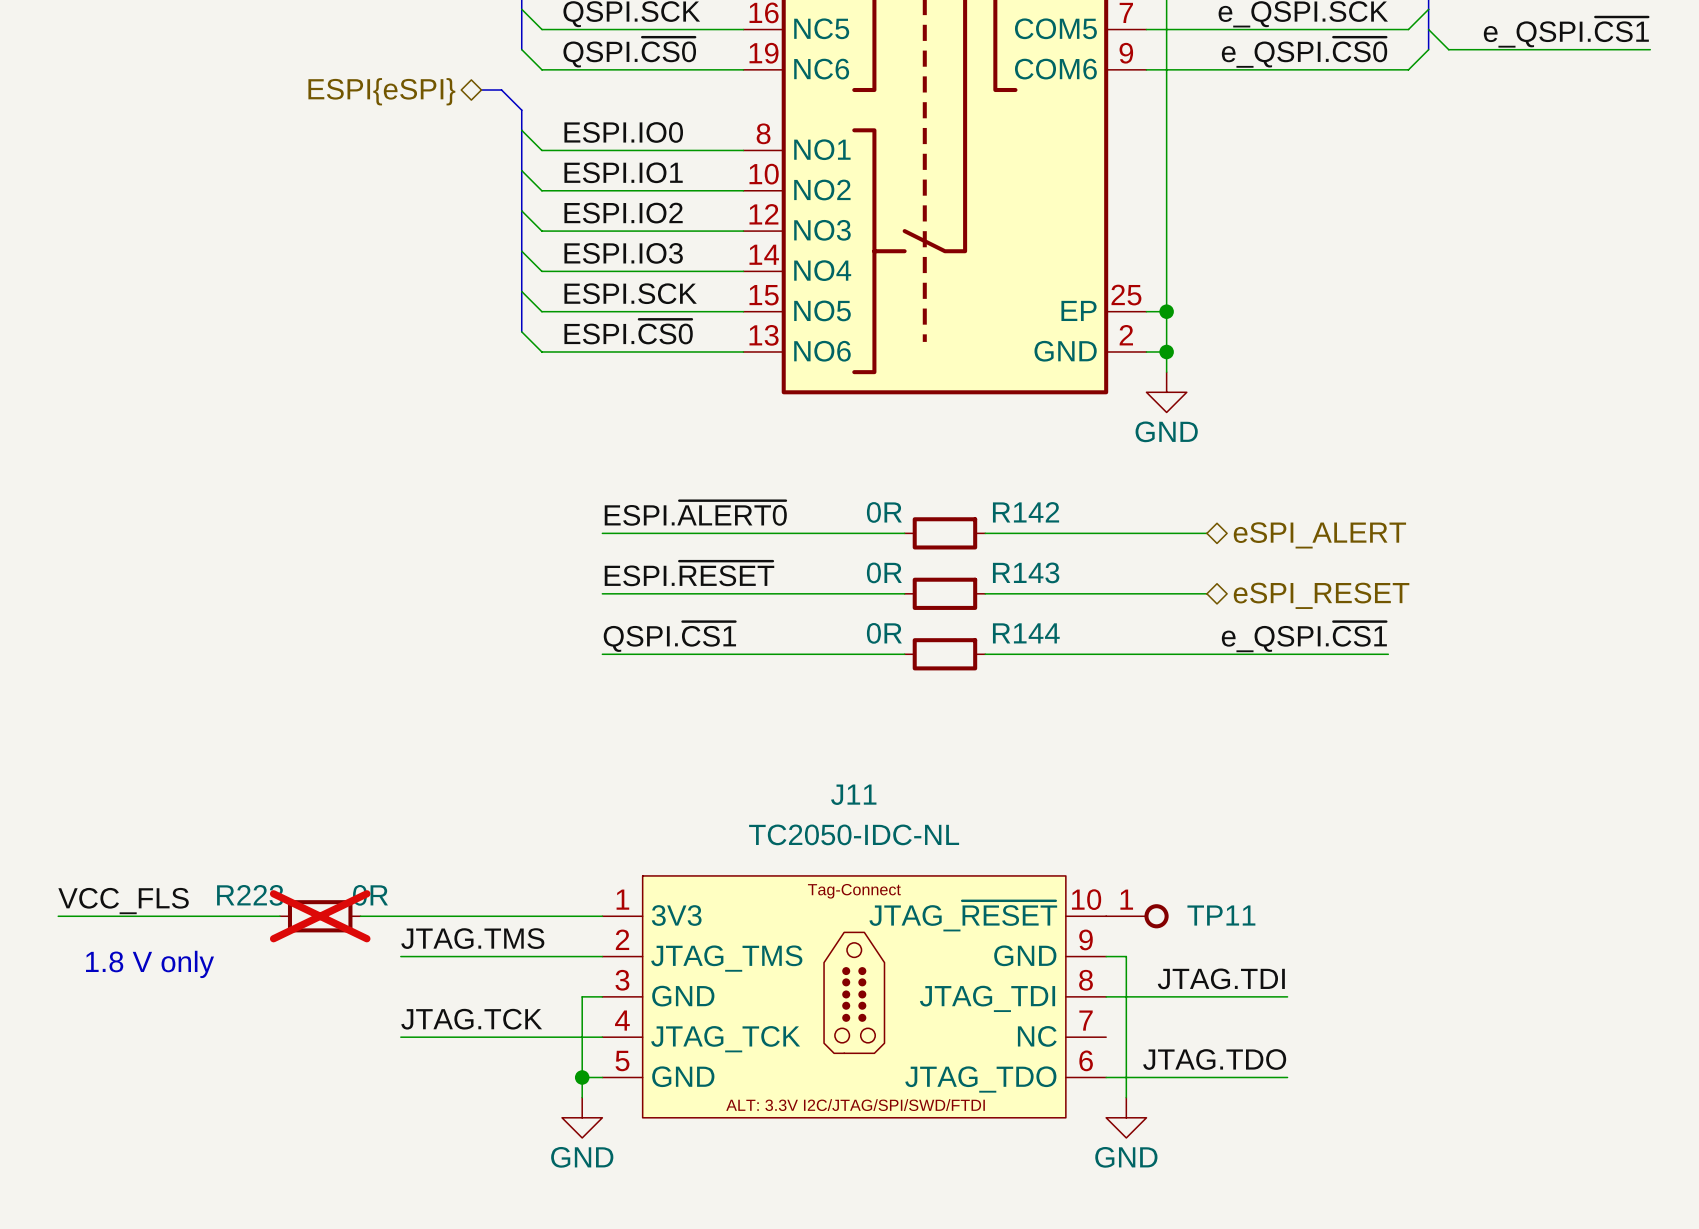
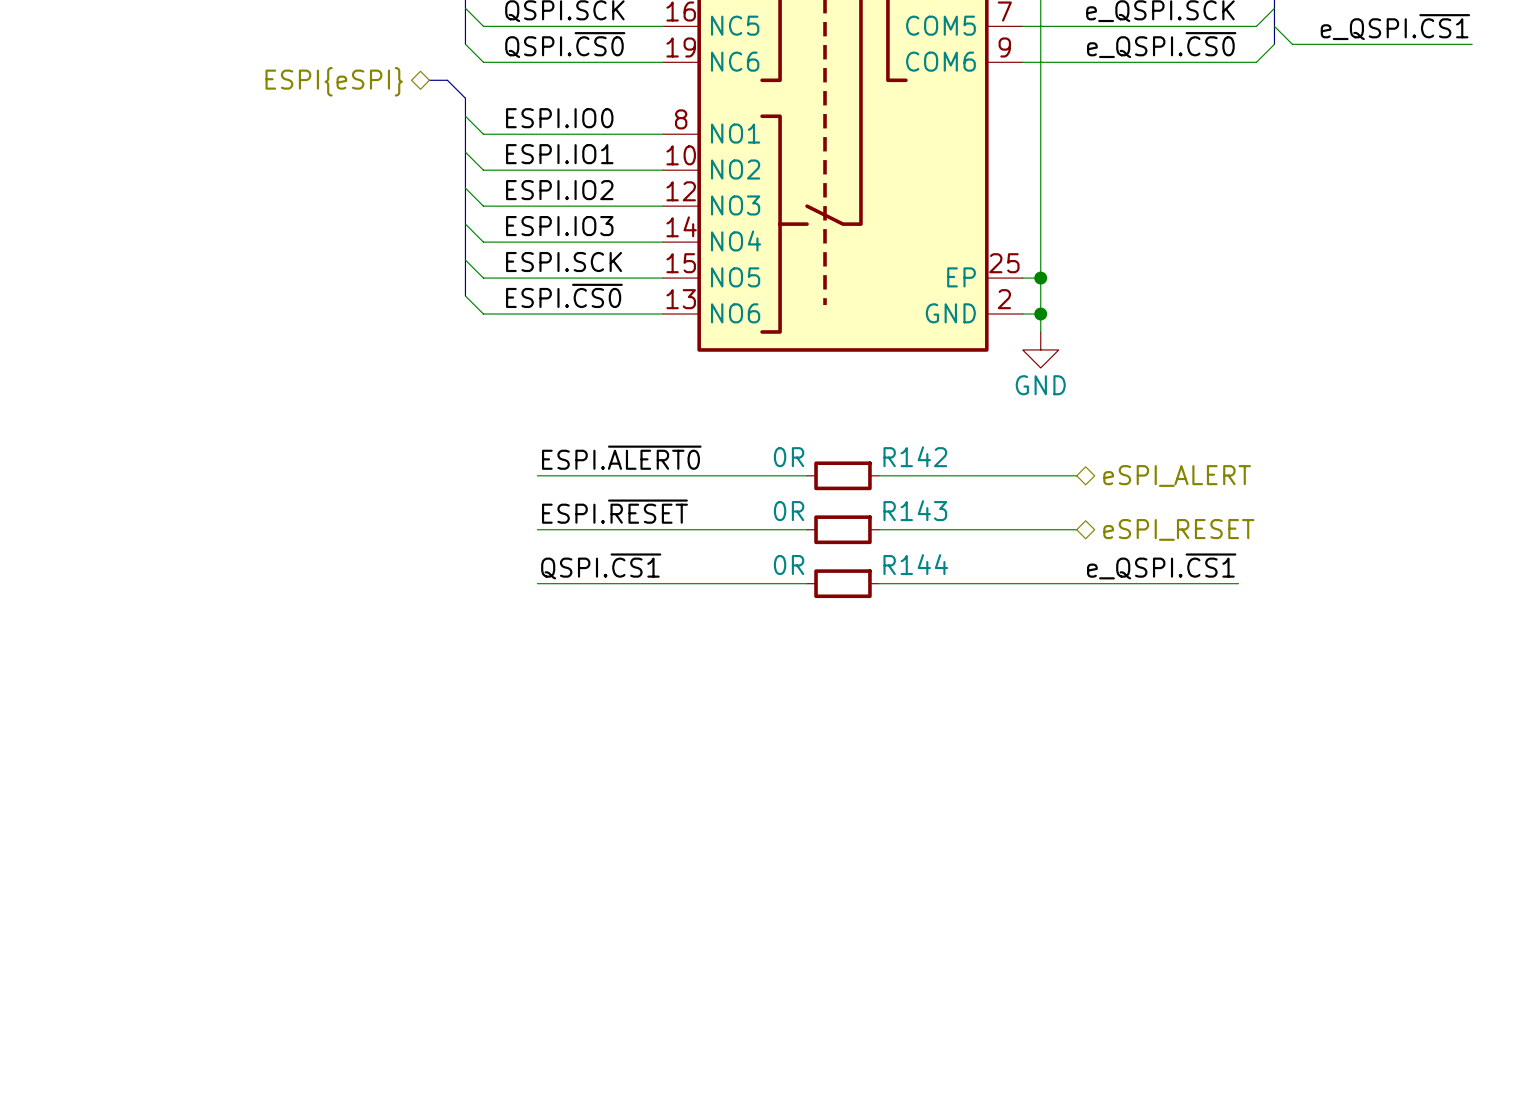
label: VCC_FLS (123, 901) -> none
wire: (58, 916) (279, 916) -> none
R223: (320, 916) -> none
wire: (360, 916) (602, 916) -> none
TP11: (1137, 916) -> none
label: JTAG.TMS (472, 938) -> none
wire: (400, 956) (602, 956) -> none
wire: (1106, 956) (1126, 956) (1126, 1097) -> none
text: 1.8 V only (150, 964) -> none
label: JTAG.TDI (1221, 978) -> none
wire: (602, 996) (582, 996) (582, 1097) -> none
J11: (854, 996) -> none
wire: (1106, 996) (1287, 996) -> none
label: JTAG.TCK (471, 1019) -> none
wire: (400, 1037) (602, 1037) -> none
label: JTAG.TDO (1214, 1059) -> none
wire: (582, 1077) (602, 1077) -> none
junction: (582, 1077) -> none
wire: (1106, 1077) (1287, 1077) -> none
power symbol: GND (582, 1117) -> none
power symbol: GND (1126, 1117) -> none

